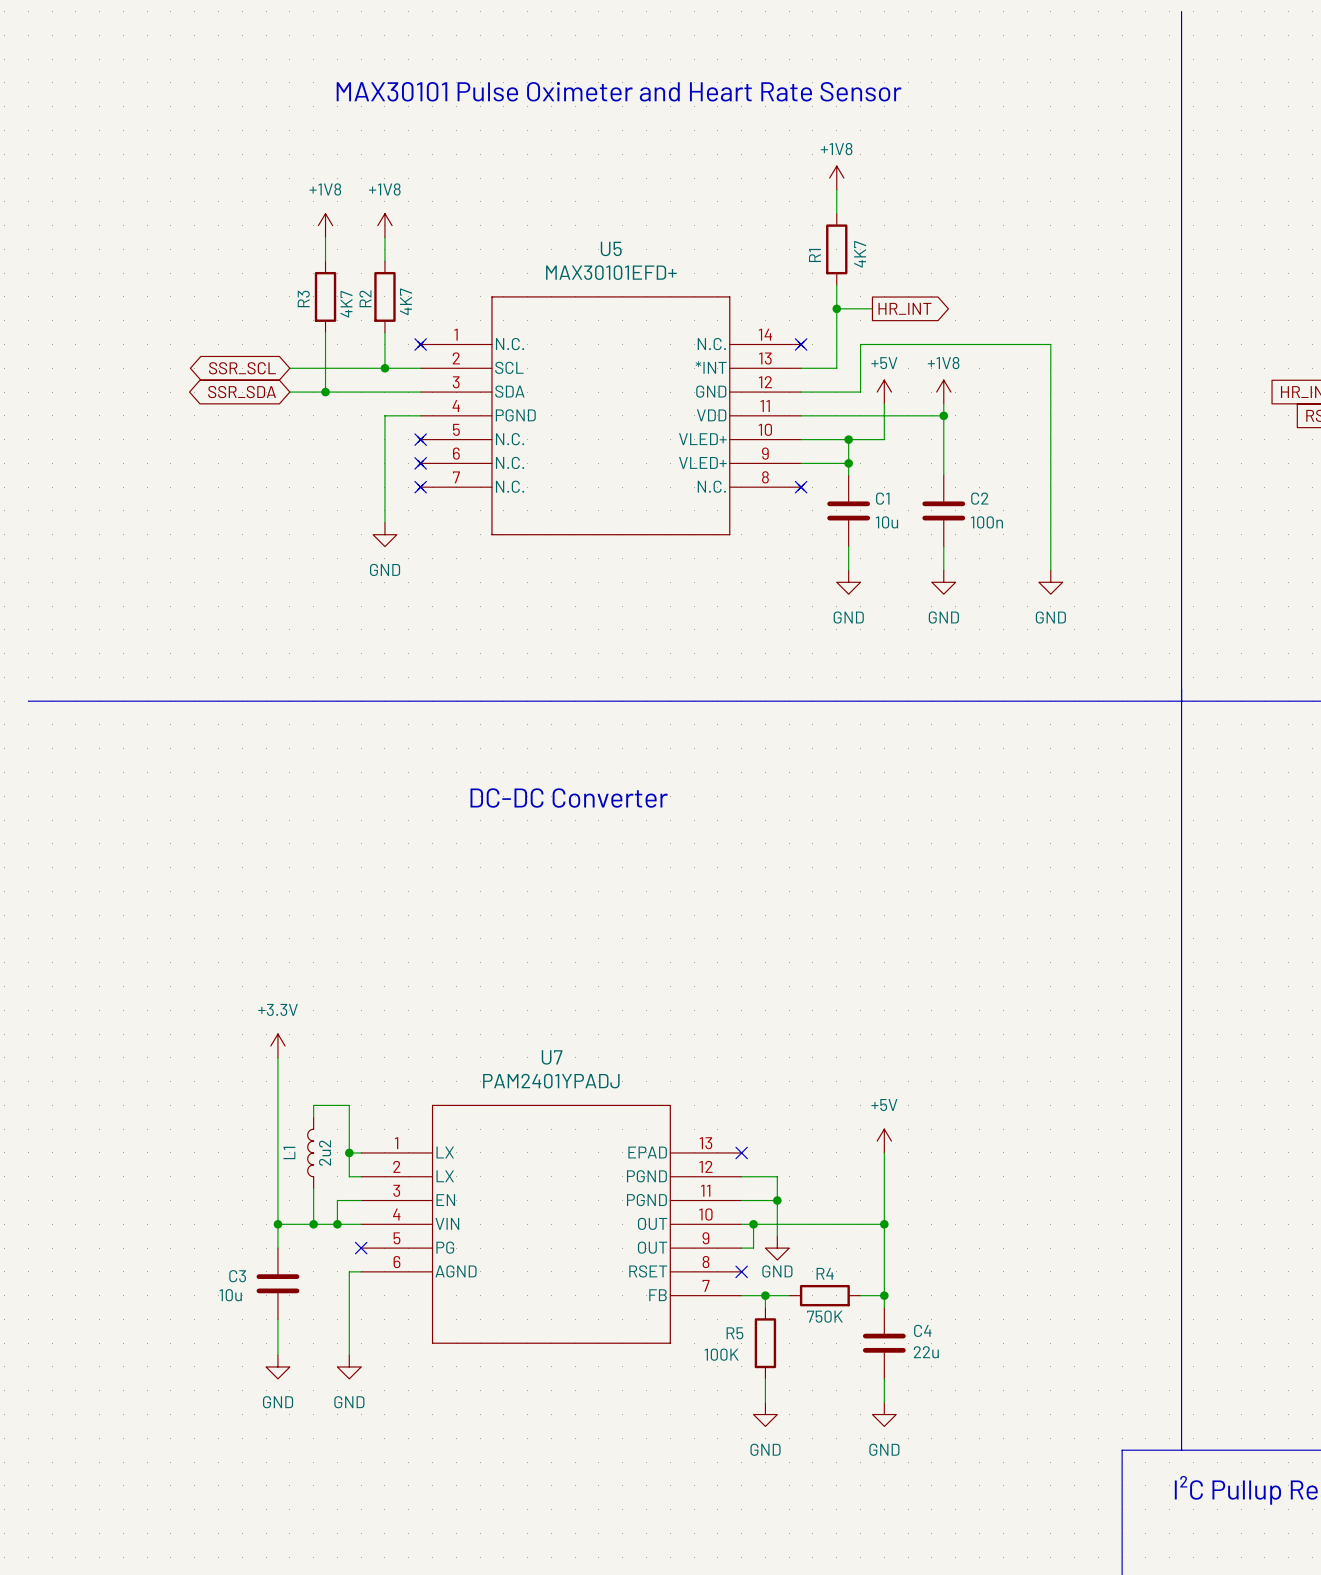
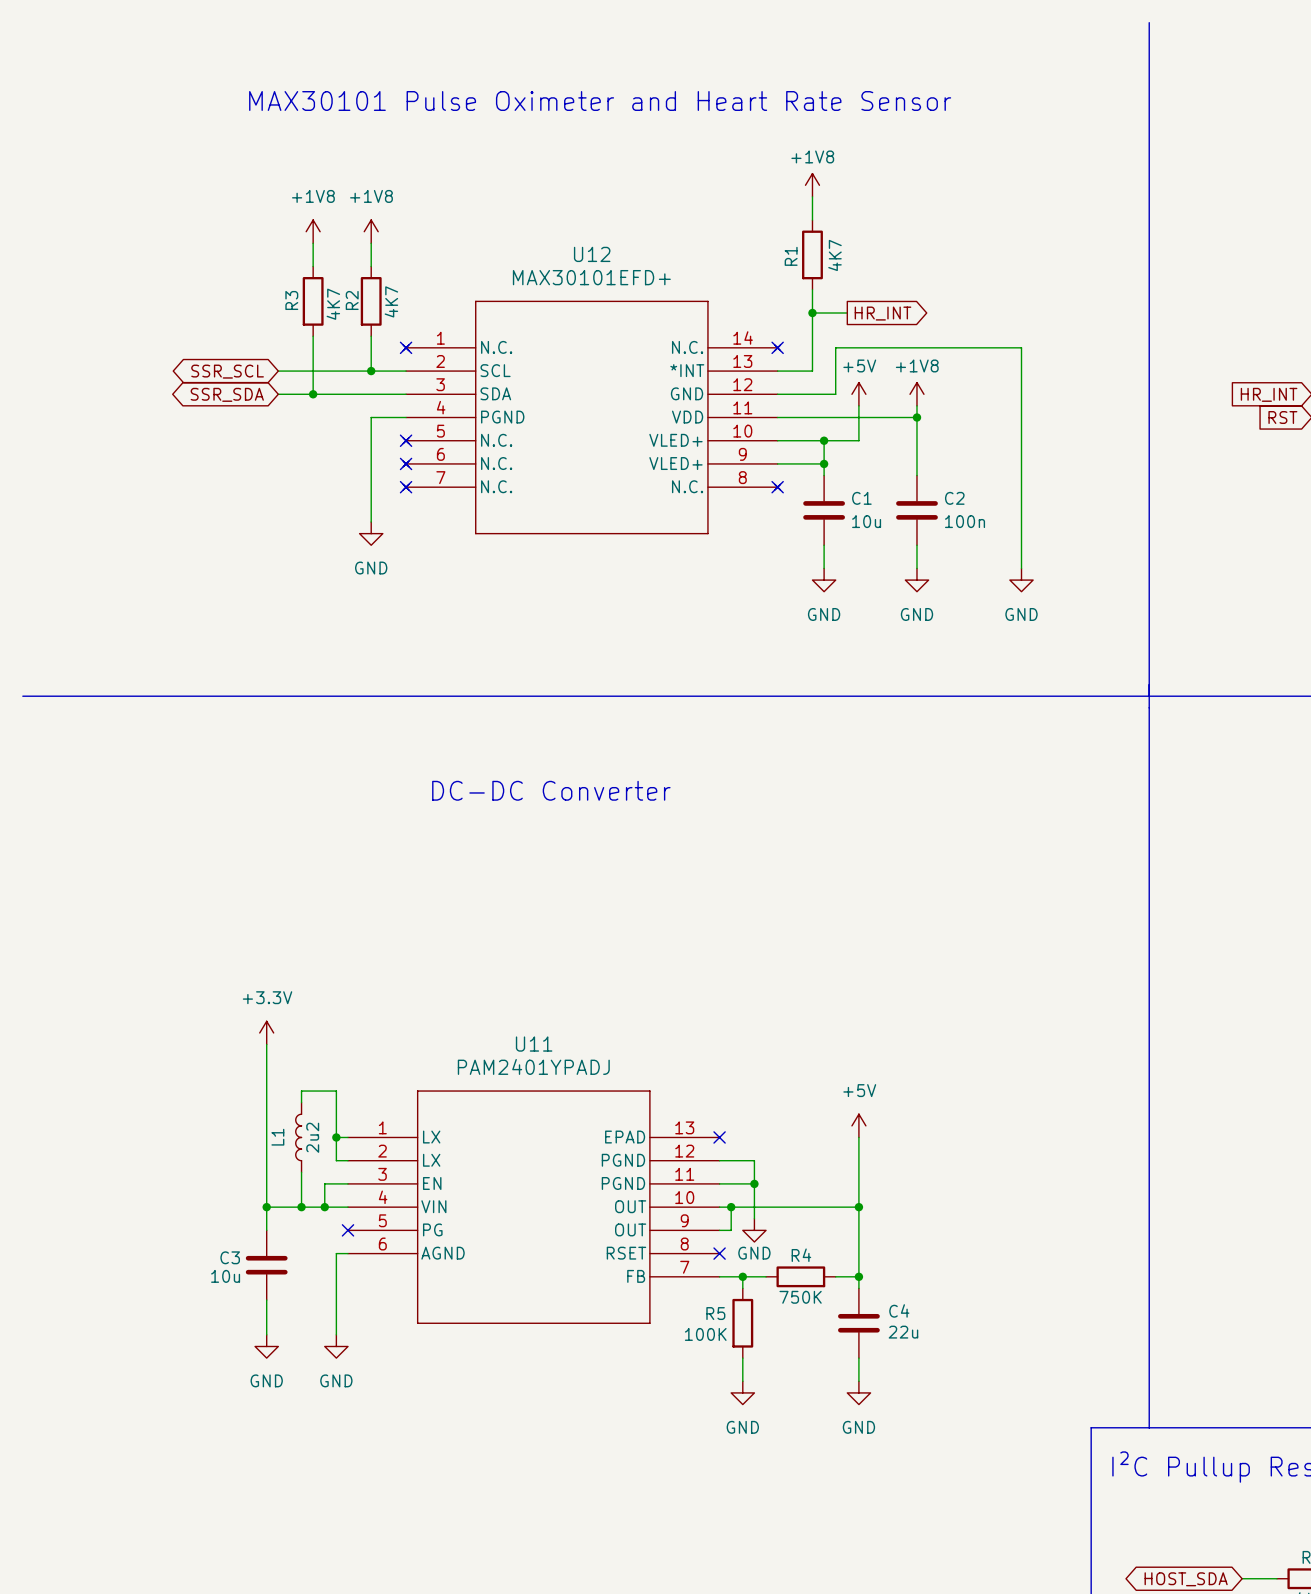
U5 name: U5 (611, 248) -> U12 (592, 254)
U7 name: U7 (552, 1057) -> U11 (534, 1044)

